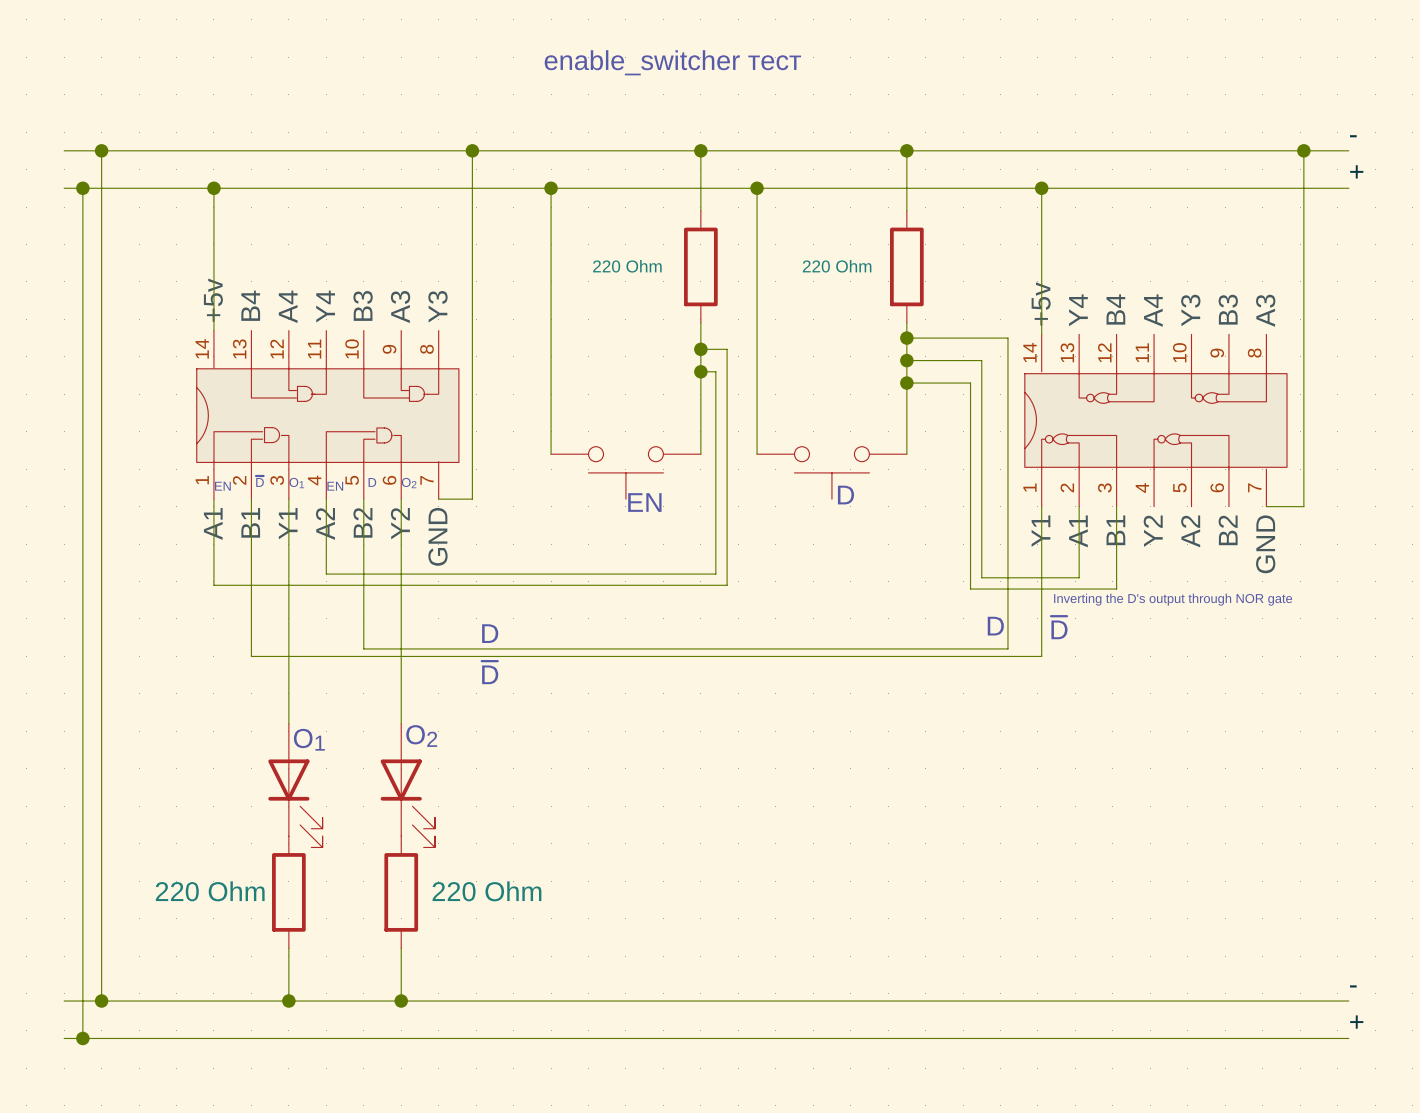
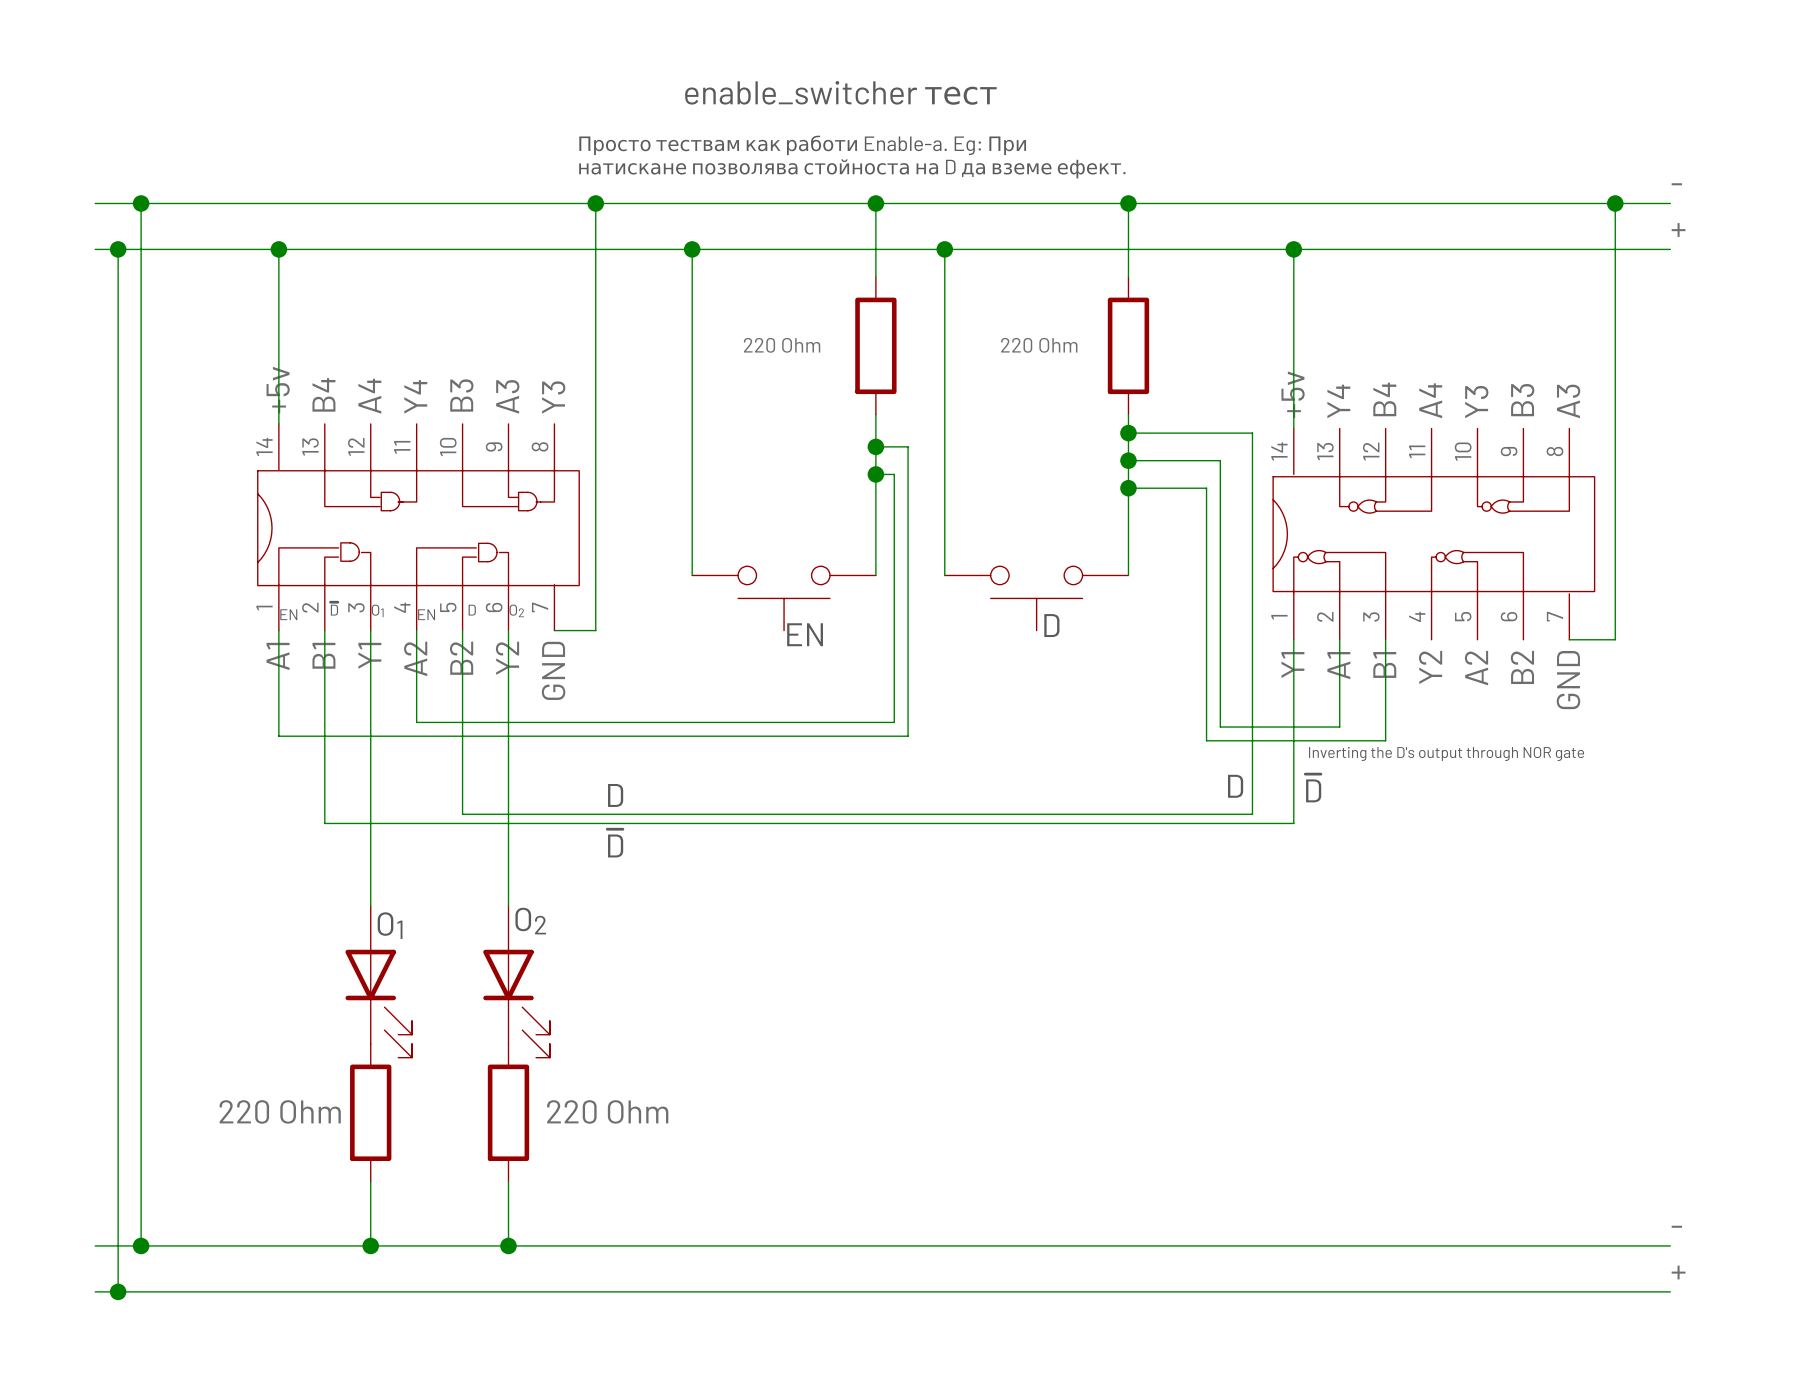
text: none -> Просто тествам как работи Enable-a. Eg: При (802, 145)
text: none -> натискане позволява стойноста на D да вземе ефект. (852, 168)

